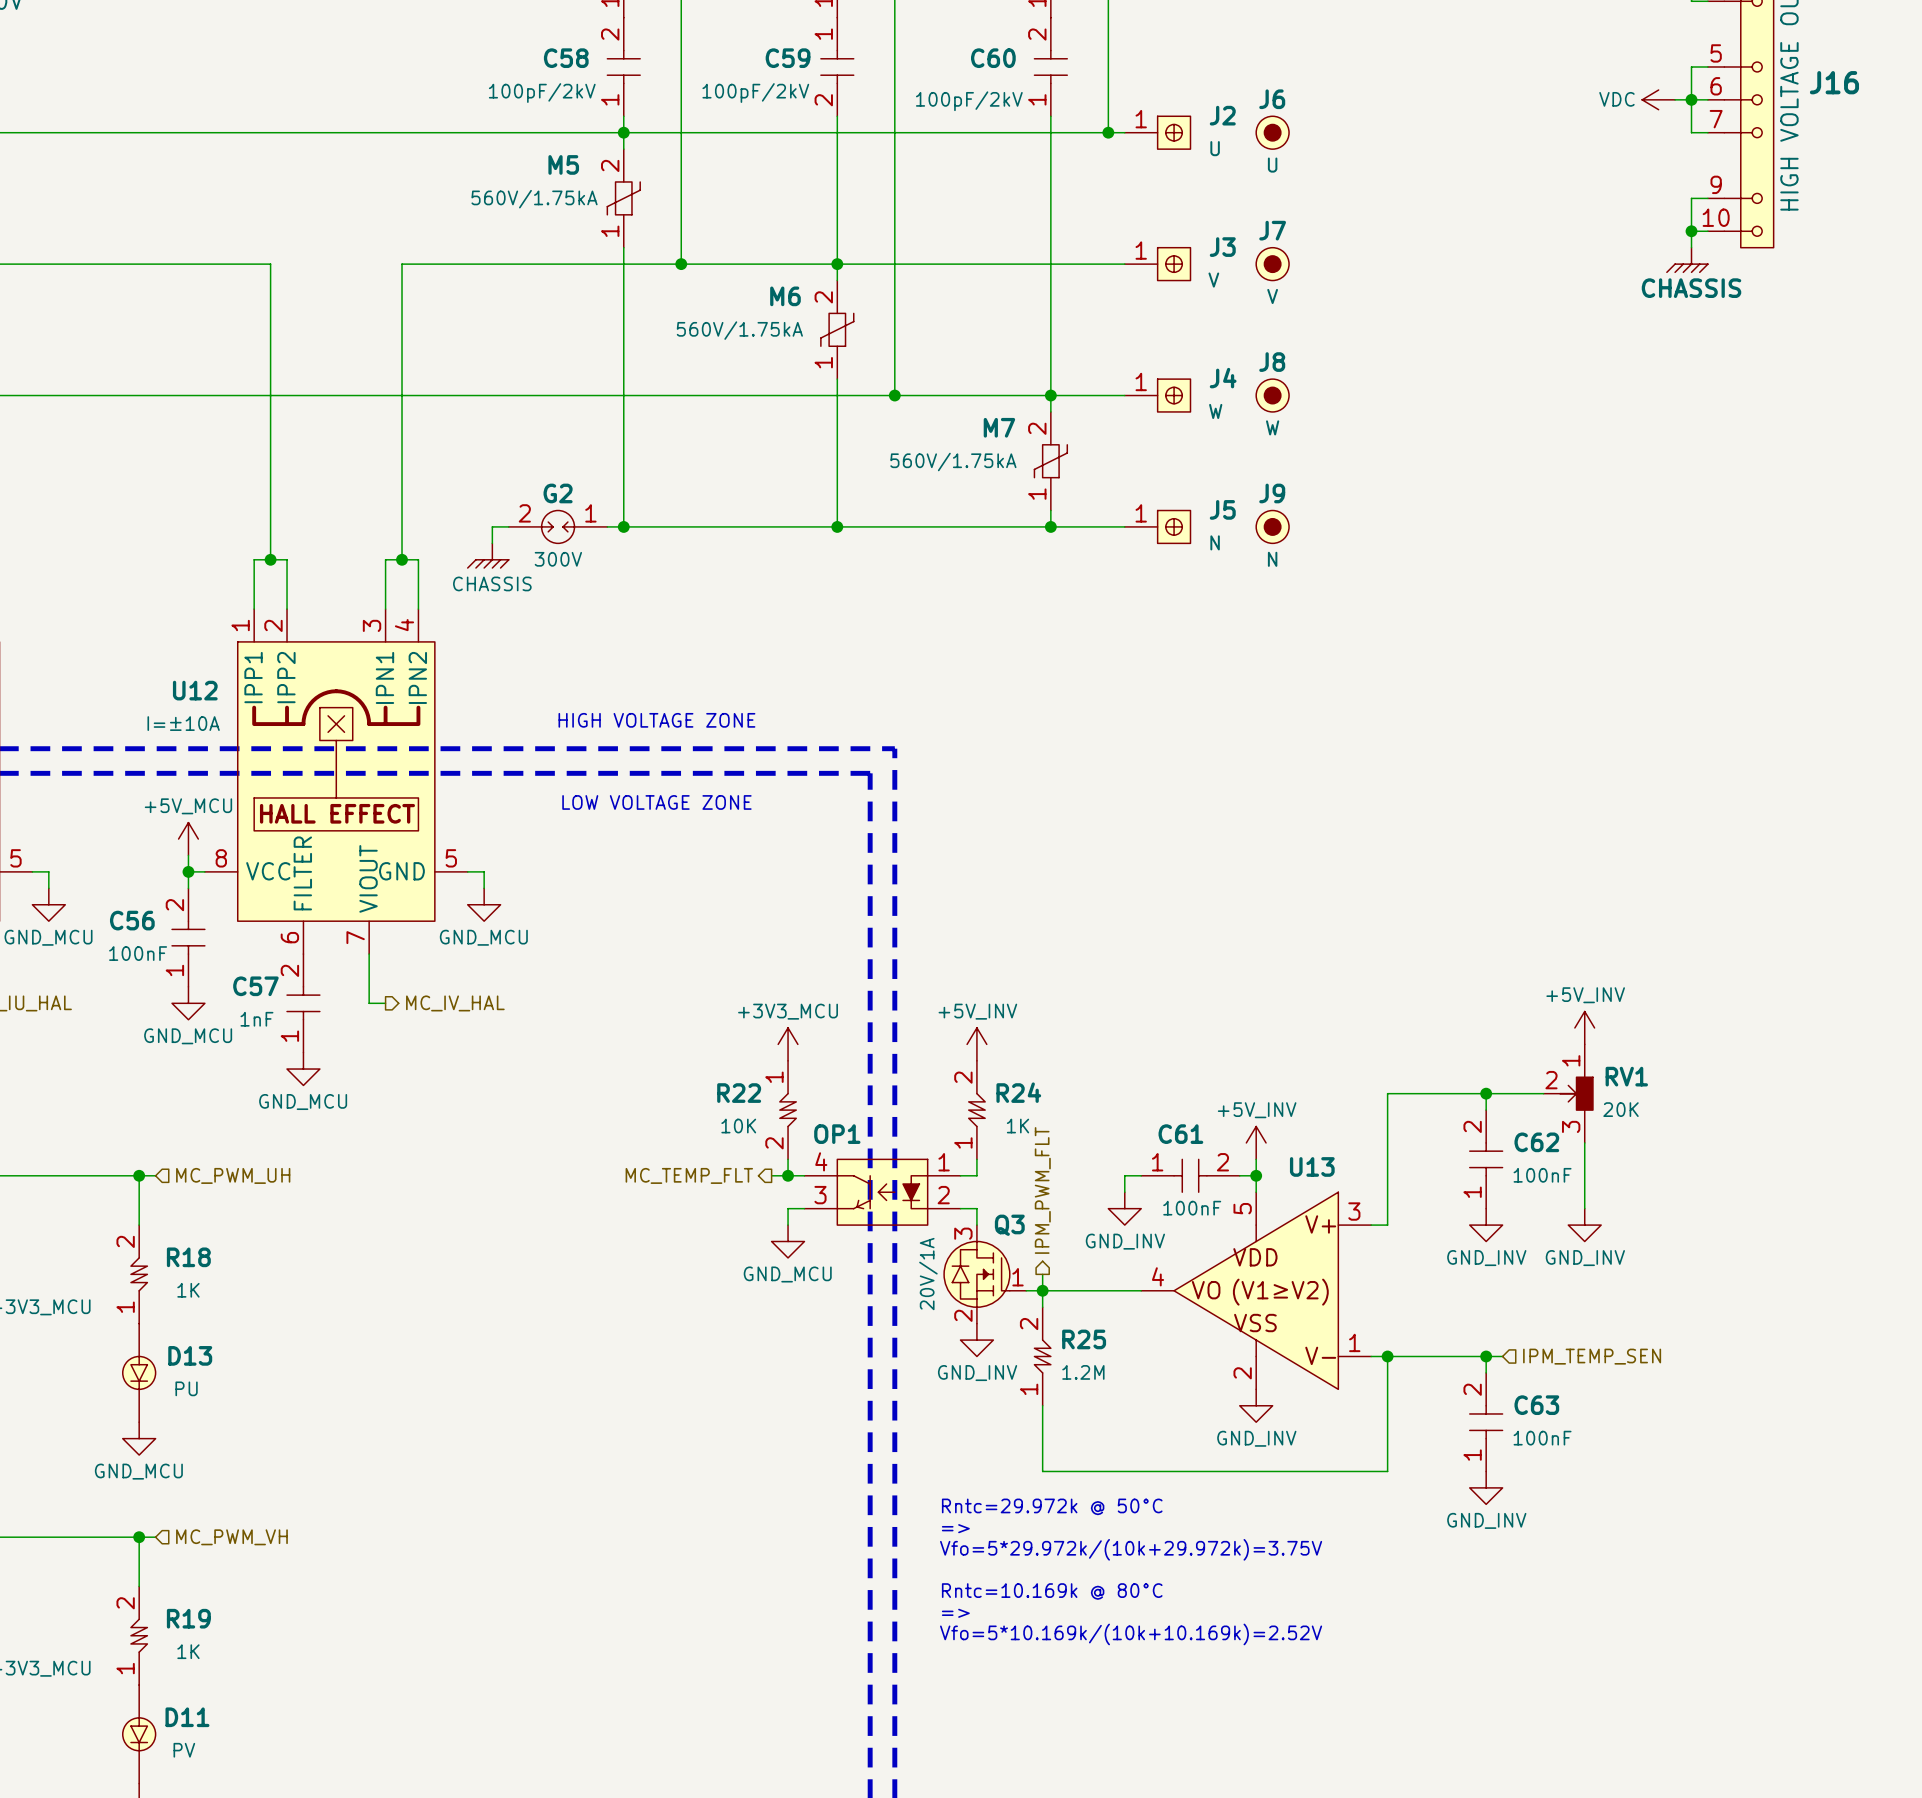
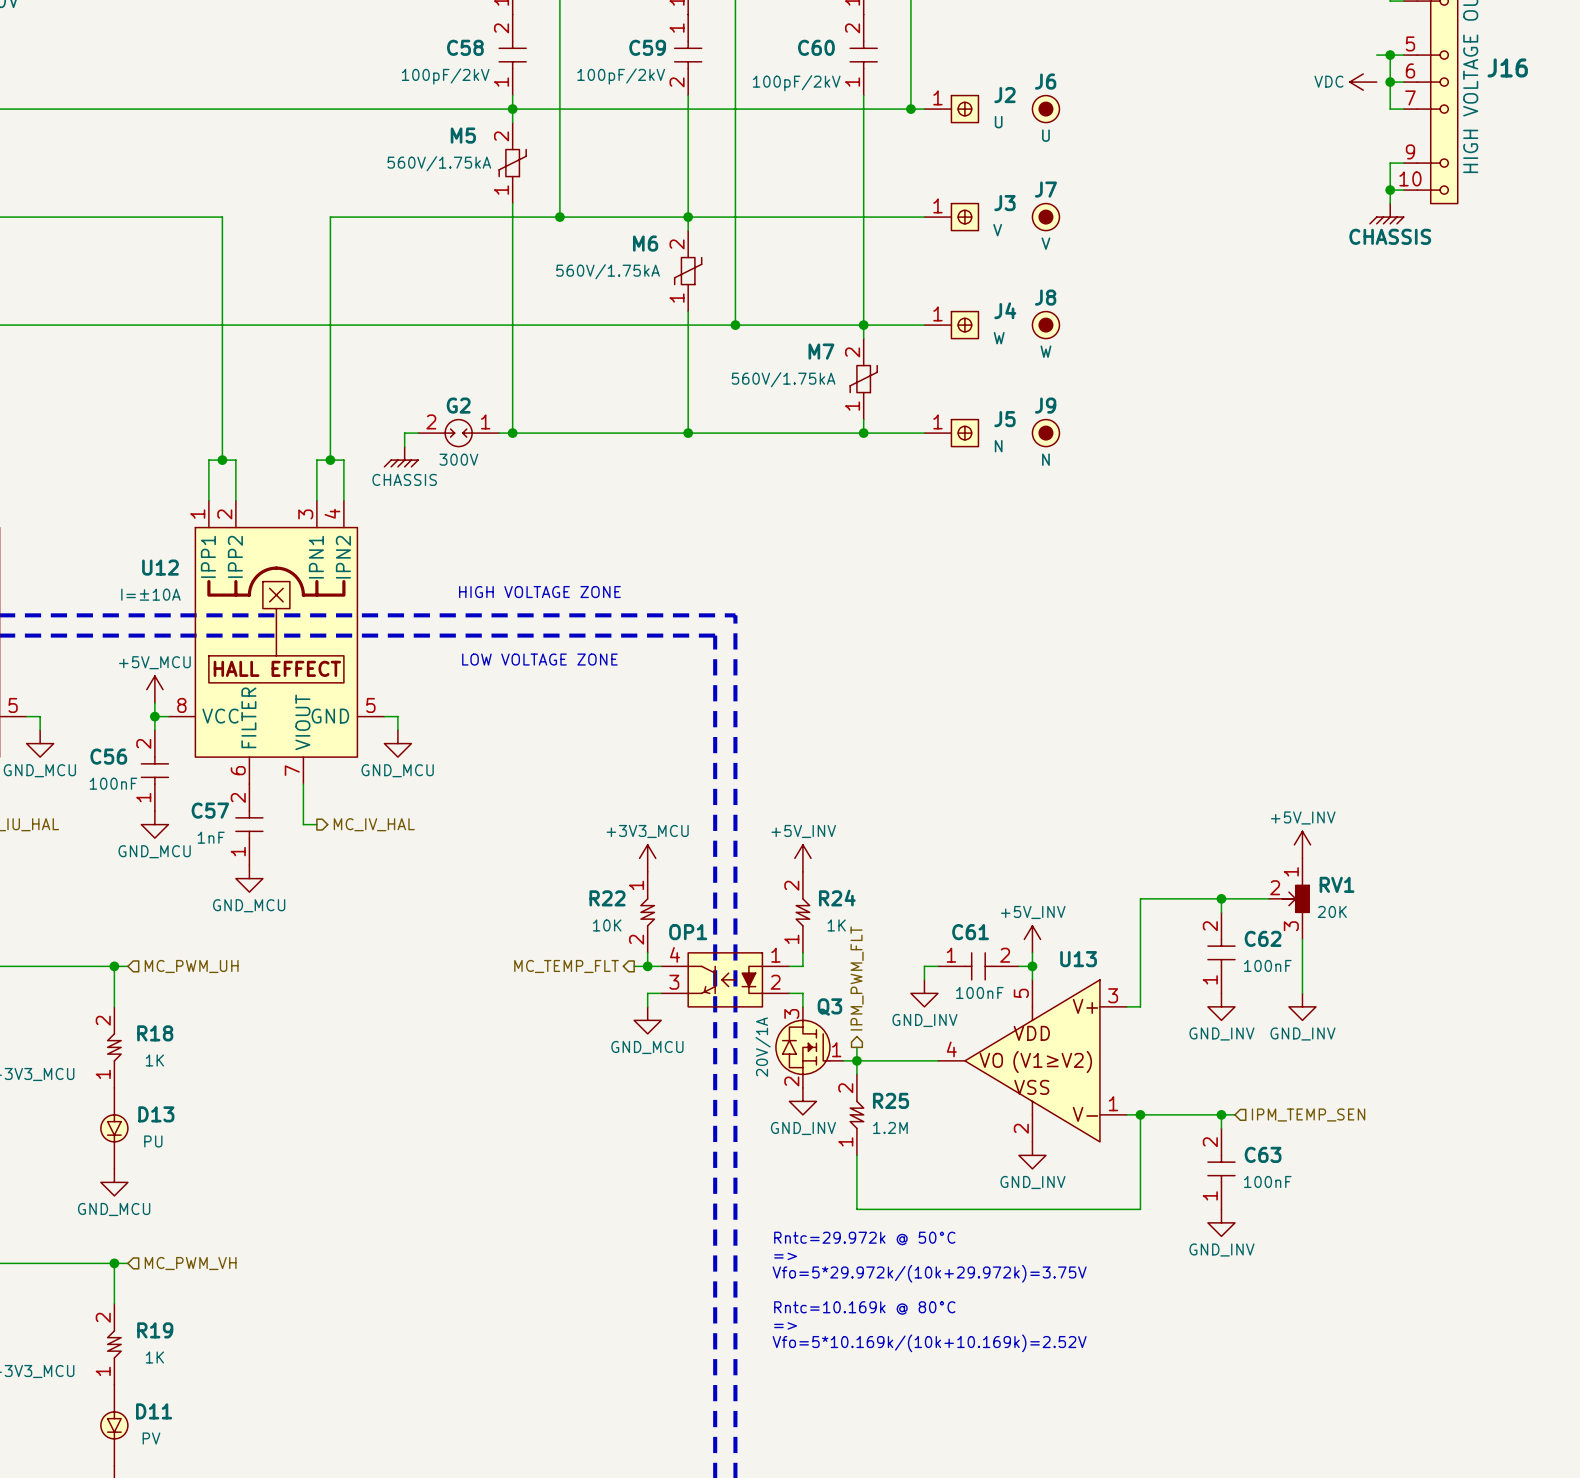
junction: none -> (1390, 55)
wire: (1675, 99) (1691, 99) -> (1376, 55) (1390, 55)

